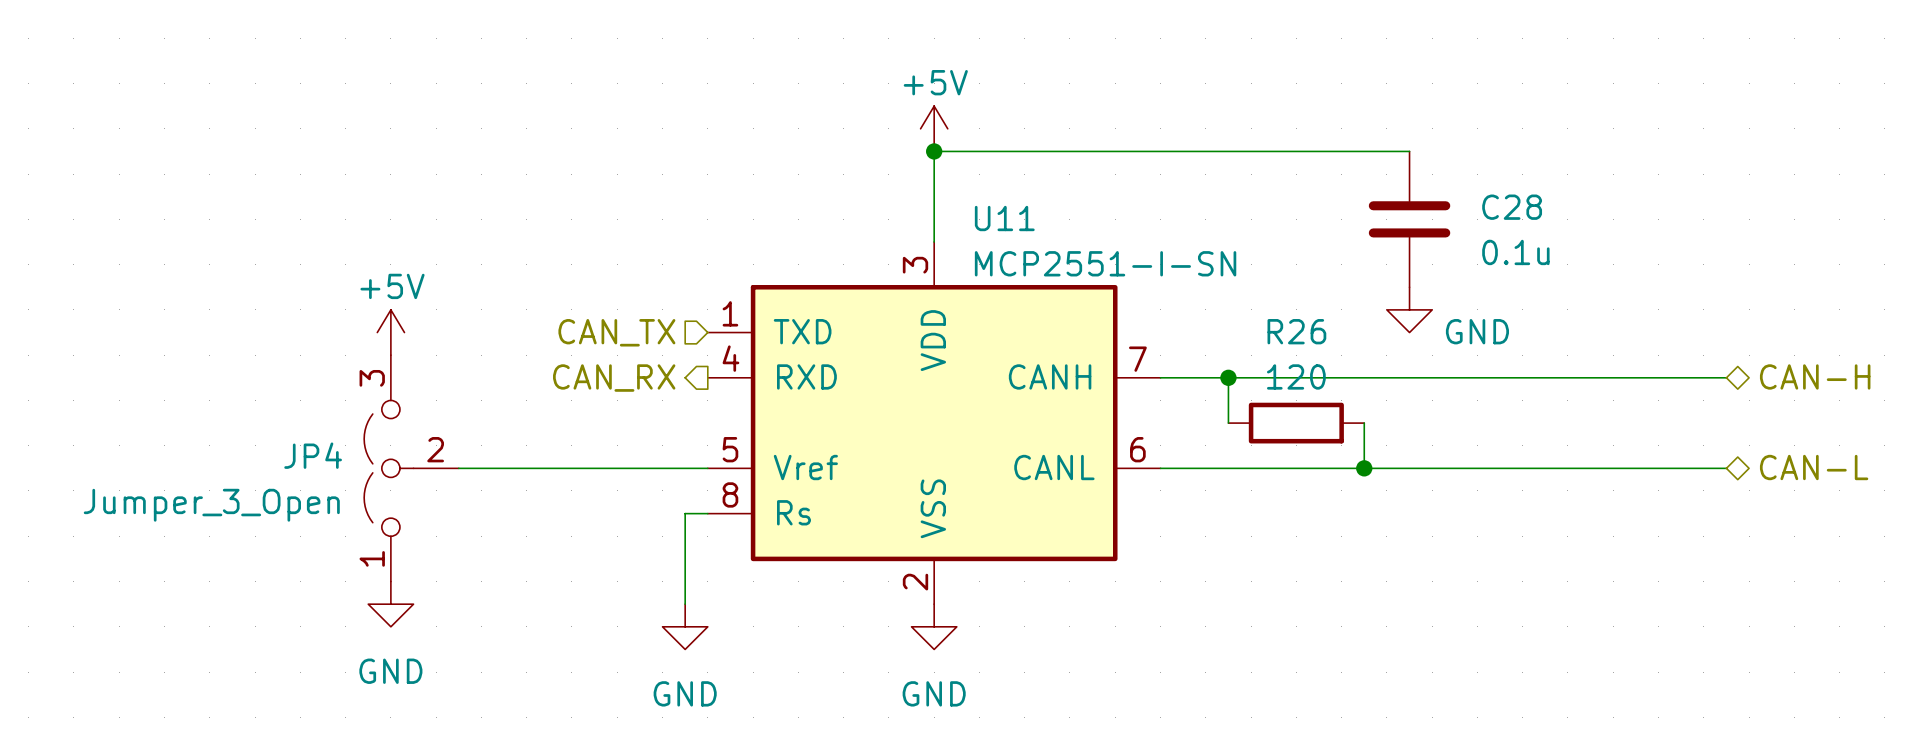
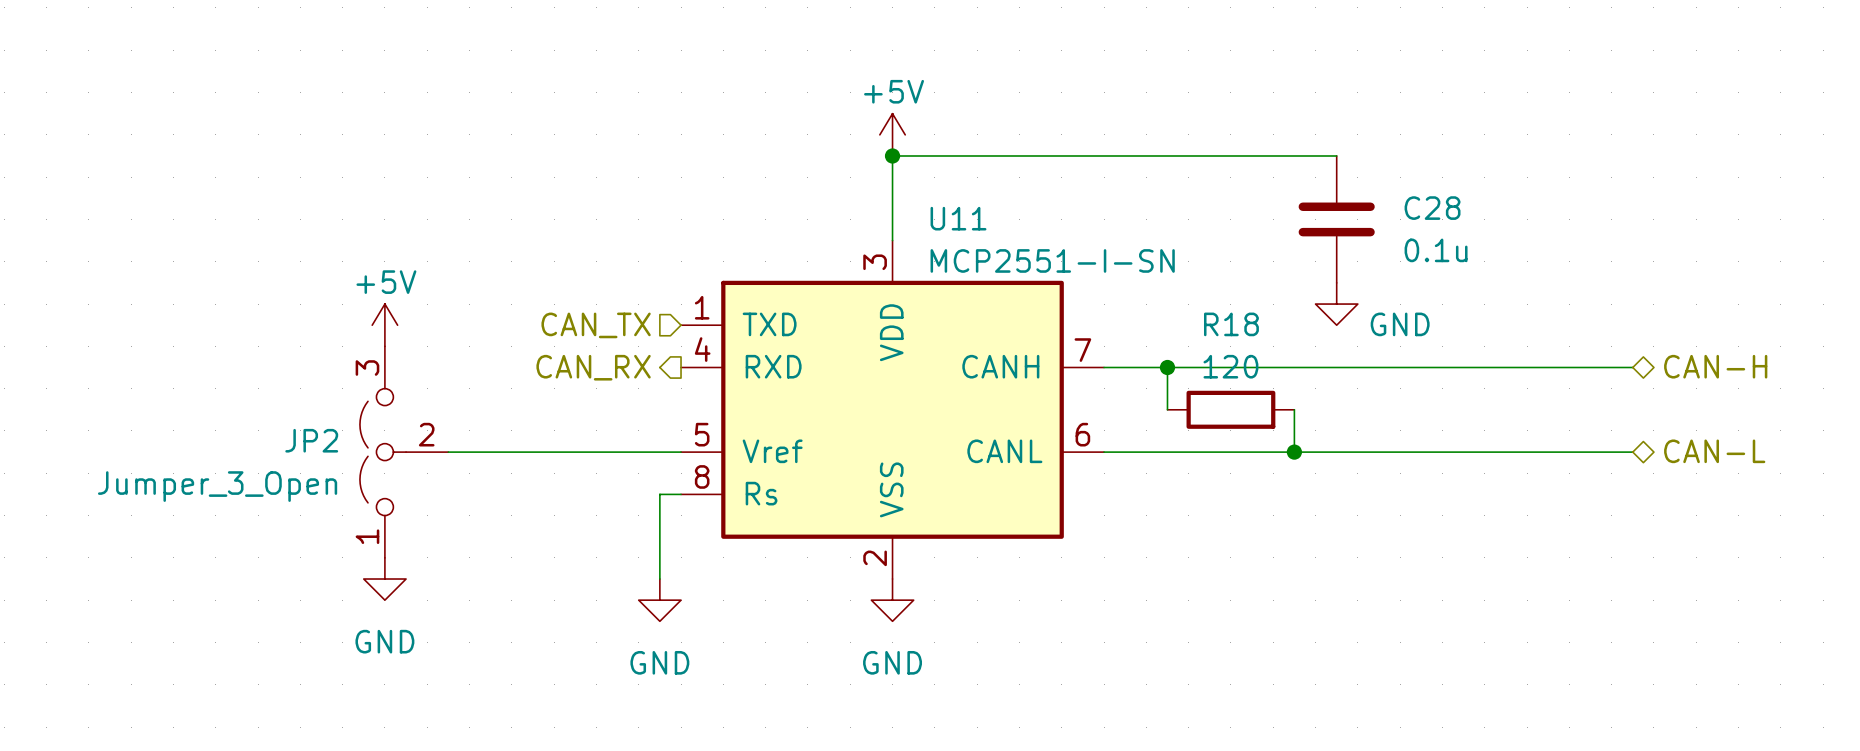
R26 name: R26 (1296, 331) -> R18 (1231, 324)
JP4 name: JP4 (313, 455) -> JP2 (311, 440)

